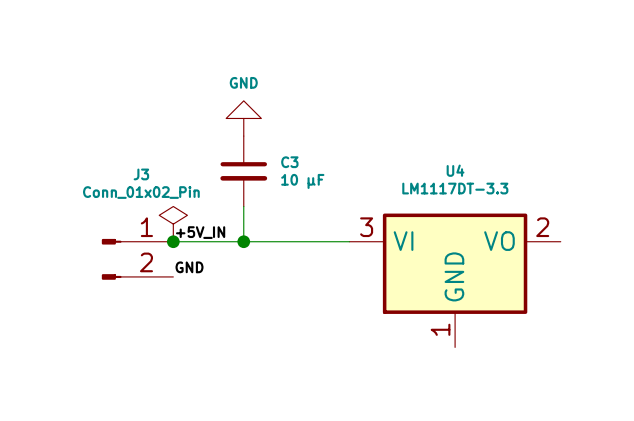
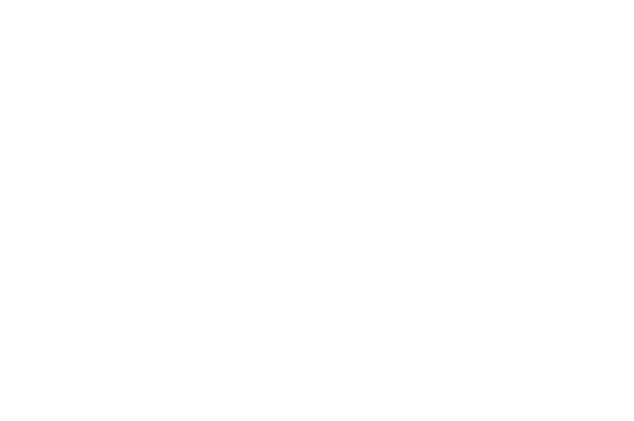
power symbol: GND (243, 118) -> none
C3: 10 µF (243, 171) -> none
wire: (243, 206) (243, 241) -> none
power symbol: (173, 224) -> none
label: +5V_IN (200, 232) -> none
wire: (173, 241) (349, 241) -> none
junction: (173, 241) -> none
junction: (243, 241) -> none
J3: Conn_01x02_Pin (137, 259) -> none
label: GND (189, 267) -> none
U4: LM1117DT-3.3 (455, 280) -> none

